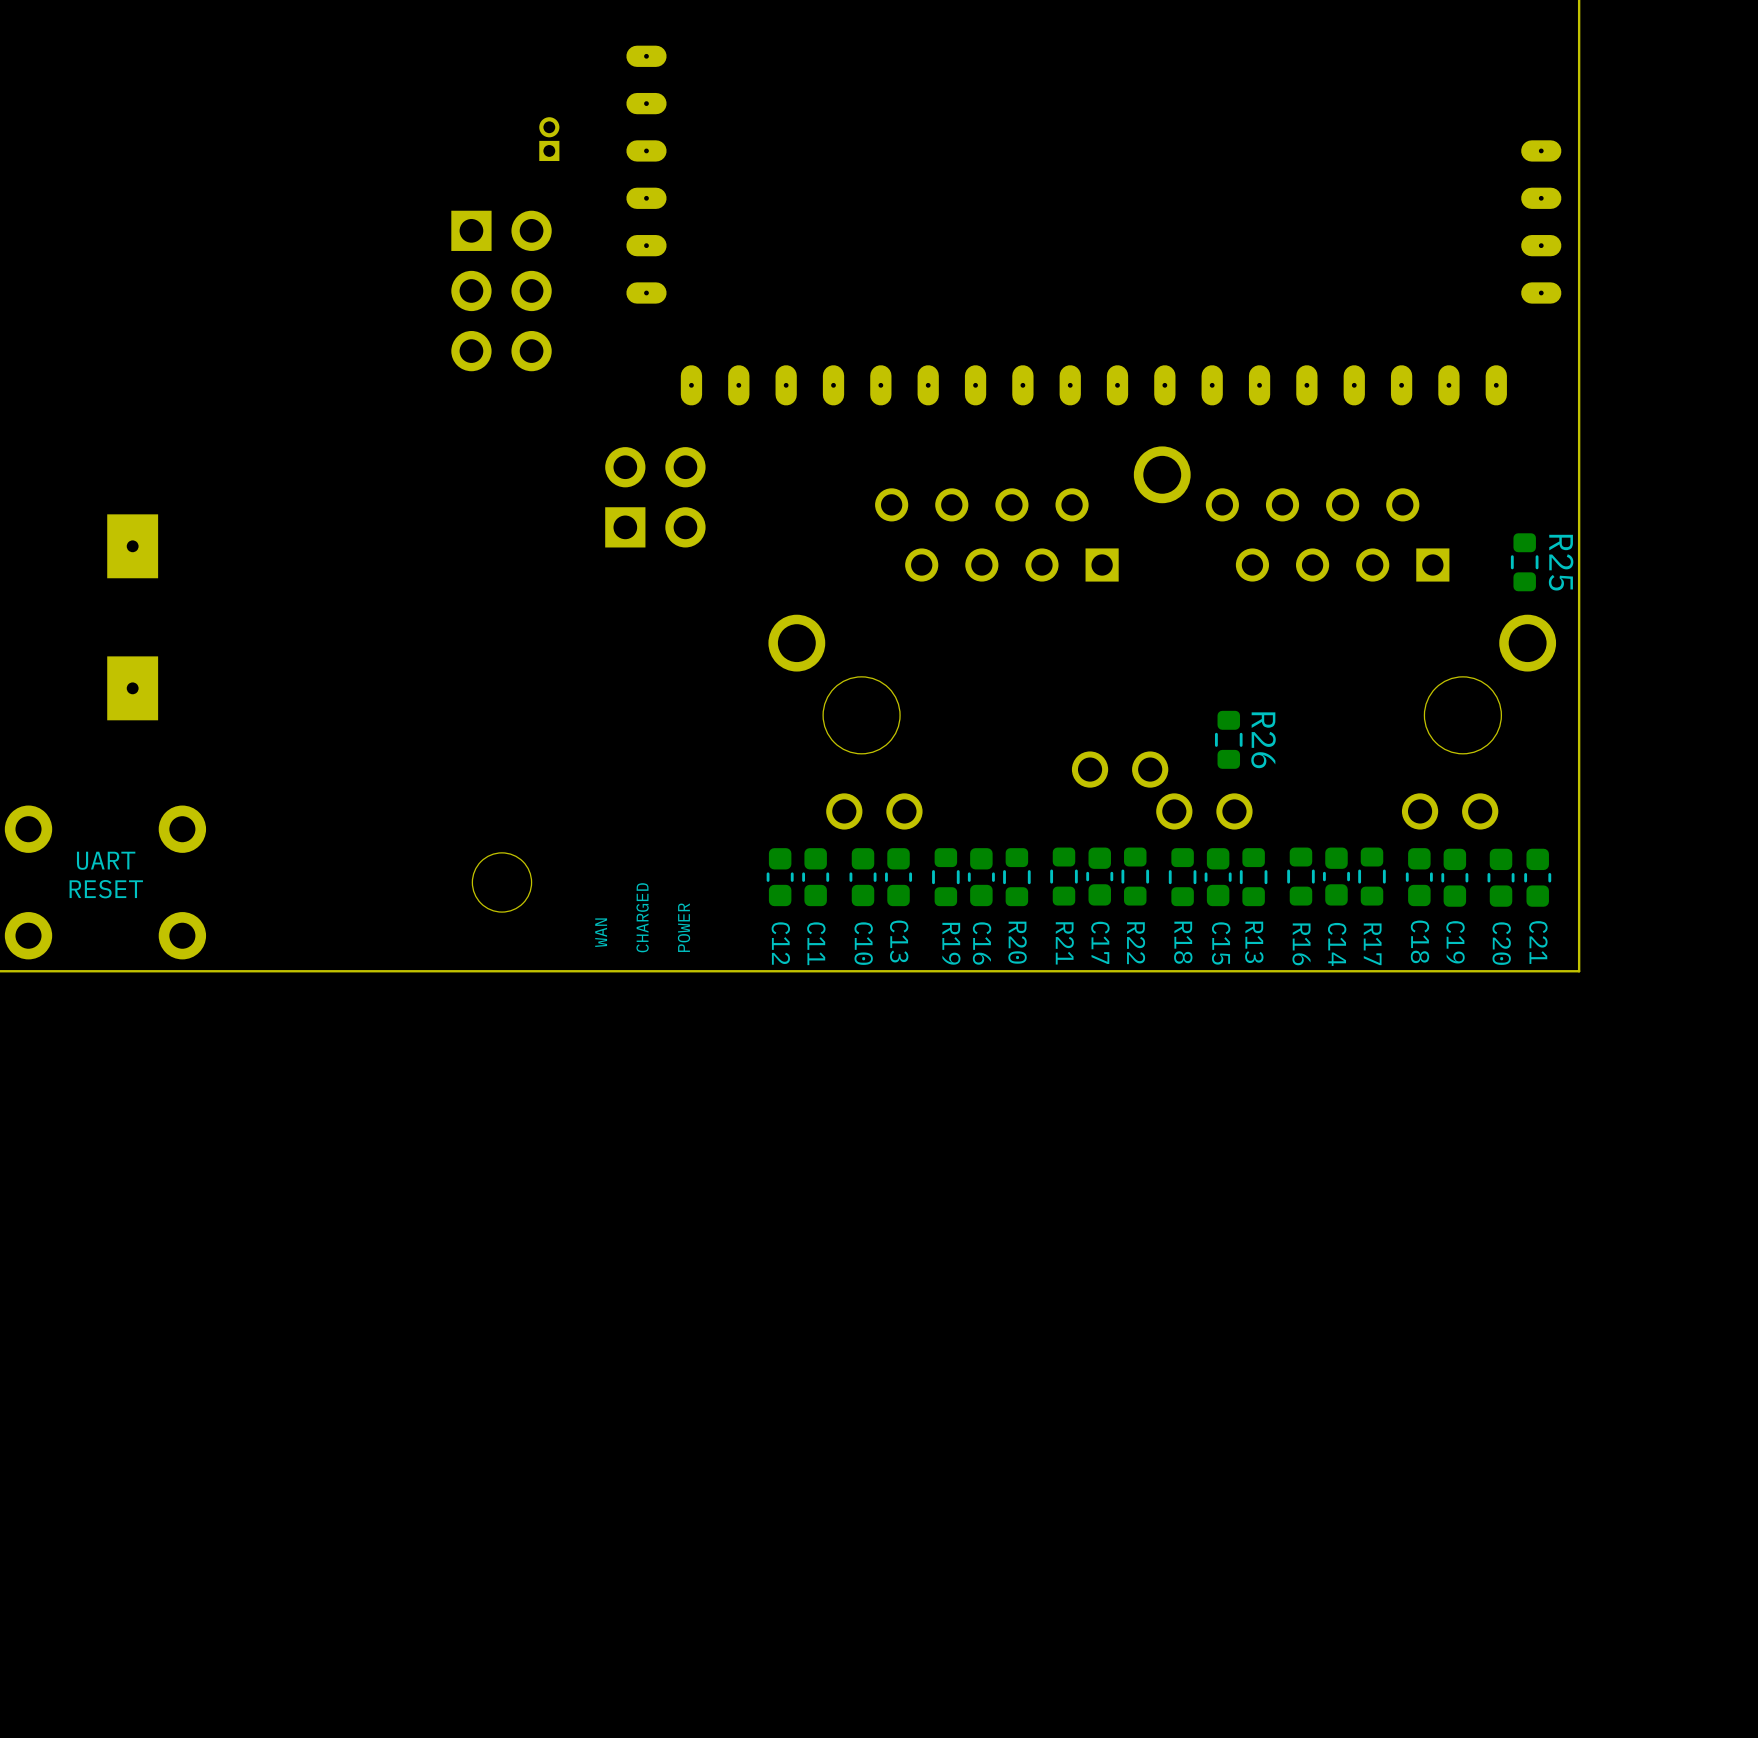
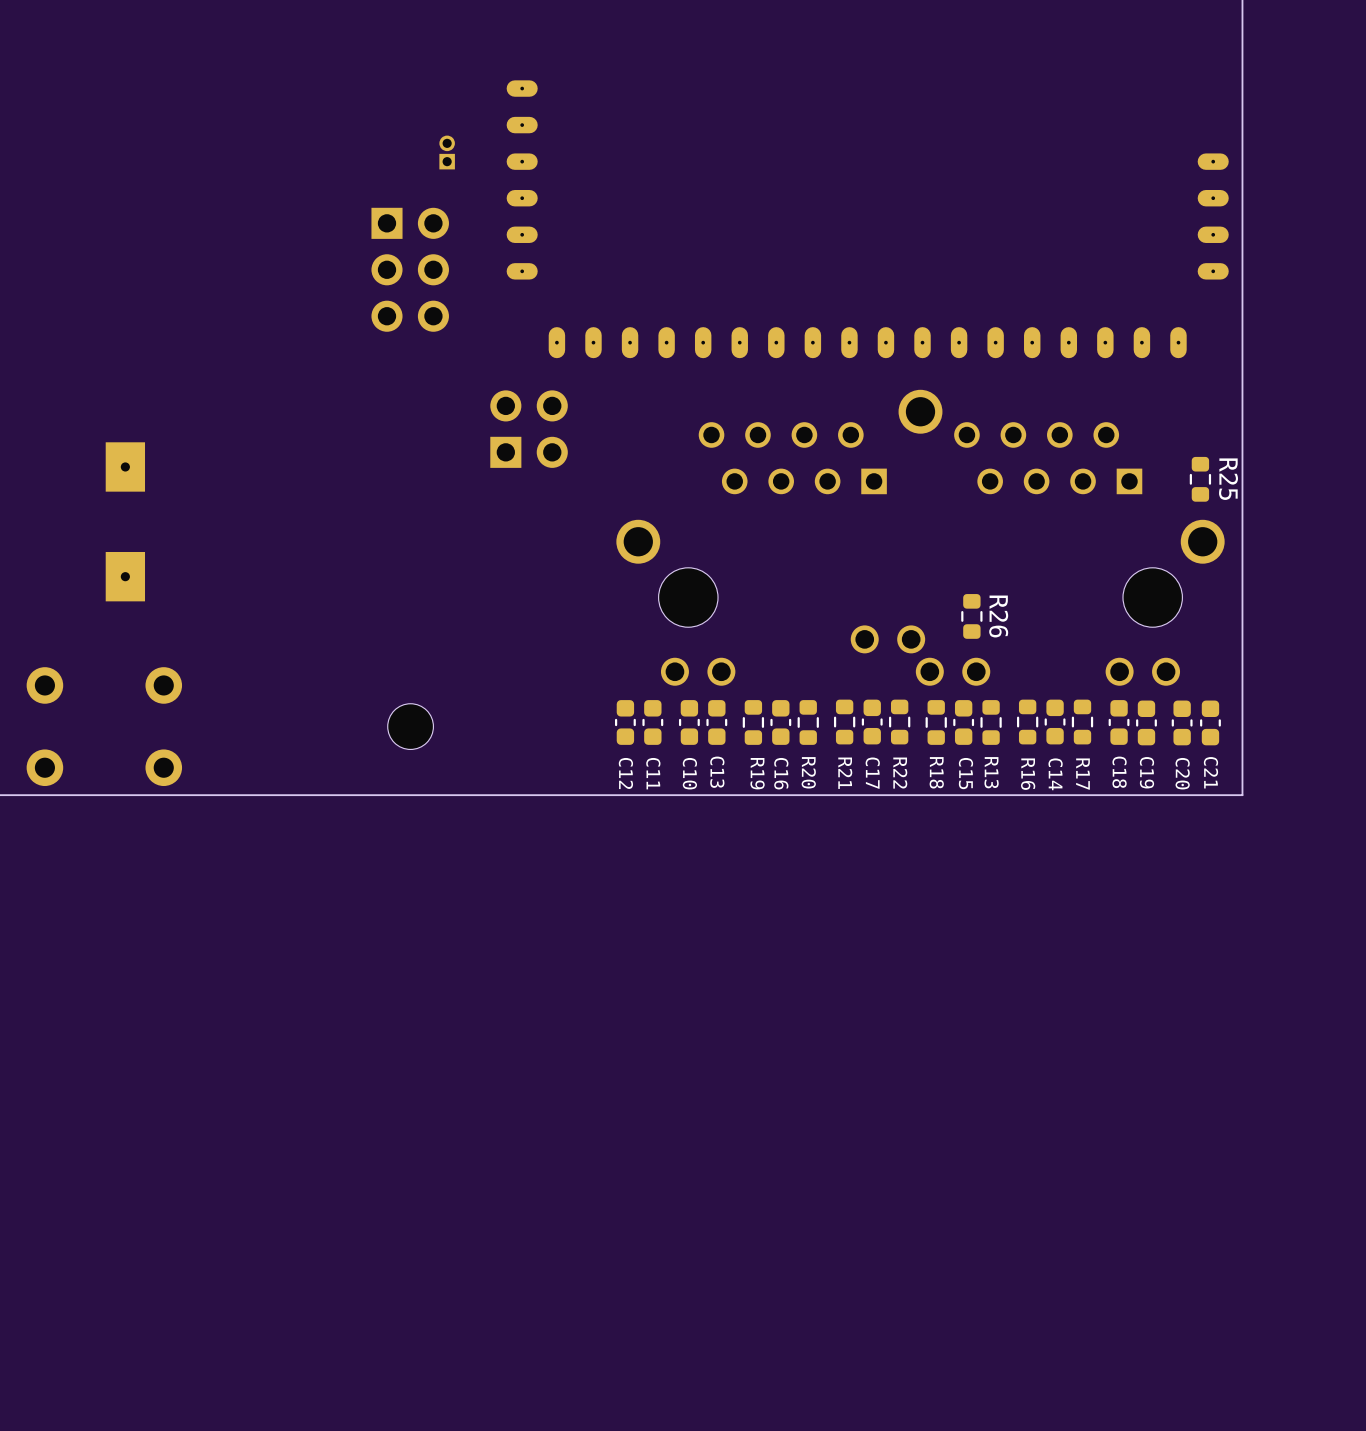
text: UART (106, 860) -> none
text: RESET (106, 889) -> none
text: CHARGED (642, 917) -> none
text: POWER (684, 927) -> none
text: WAN (601, 932) -> none

